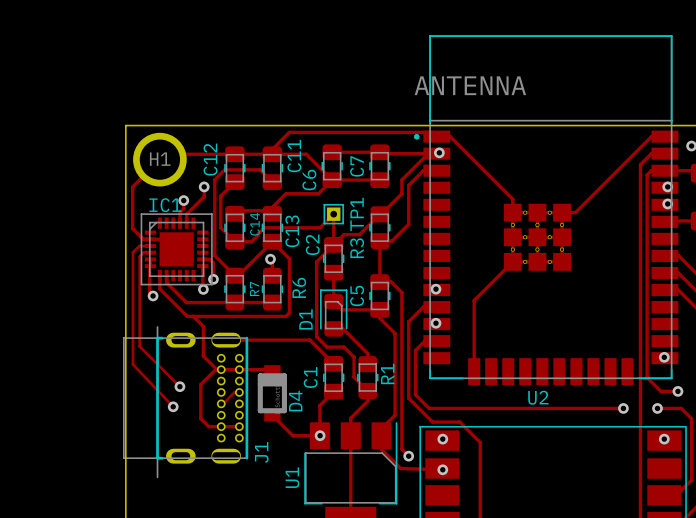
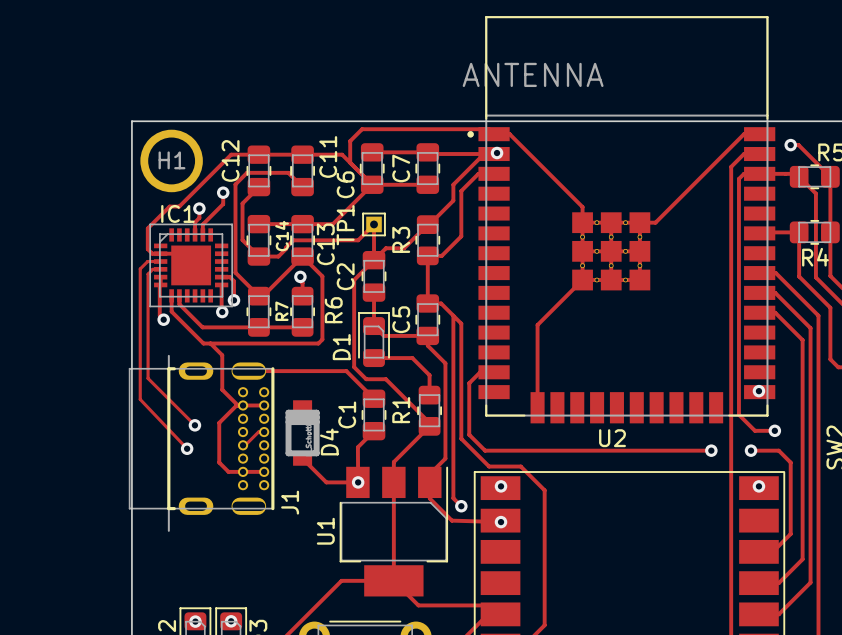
track: (323, 132) (289, 132) (272, 149) (272, 154) -> (362, 129) (350, 141) (350, 162)
track: (211, 154) (165, 154) (132, 186) (132, 228) (139, 235) -> (231, 154) (179, 206) (169, 206) (147, 228) (147, 249)
via: (667, 186) -> none
track: (318, 193) (286, 193) (272, 207) (272, 213) (269, 210) (238, 210) (234, 213) -> (356, 200) (332, 224) (258, 224)
via: (667, 203) -> none
TP1 name position: TP1 (357, 214) -> TP1 (345, 225)
C2 name position: C2 (312, 244) -> C2 (345, 276)
R3 name position: R3 (357, 248) -> R3 (401, 239)
via: (435, 289) -> none
track: (436, 307) (423, 307) (408, 321) -> (453, 315) (461, 323) (461, 349)
via: (435, 323) -> none
track: (343, 328) (367, 353) (367, 364) -> (384, 358) (412, 358) (429, 375) (429, 395)
track: (354, 357) (354, 377) (367, 390) (367, 401) -> (397, 390) (429, 422) (429, 426) (413, 442)
track: (239, 369) (270, 369) (272, 371) -> none
R1 name position: R1 (387, 373) -> R1 (401, 410)
R1 position: (367, 377) -> (429, 410)

